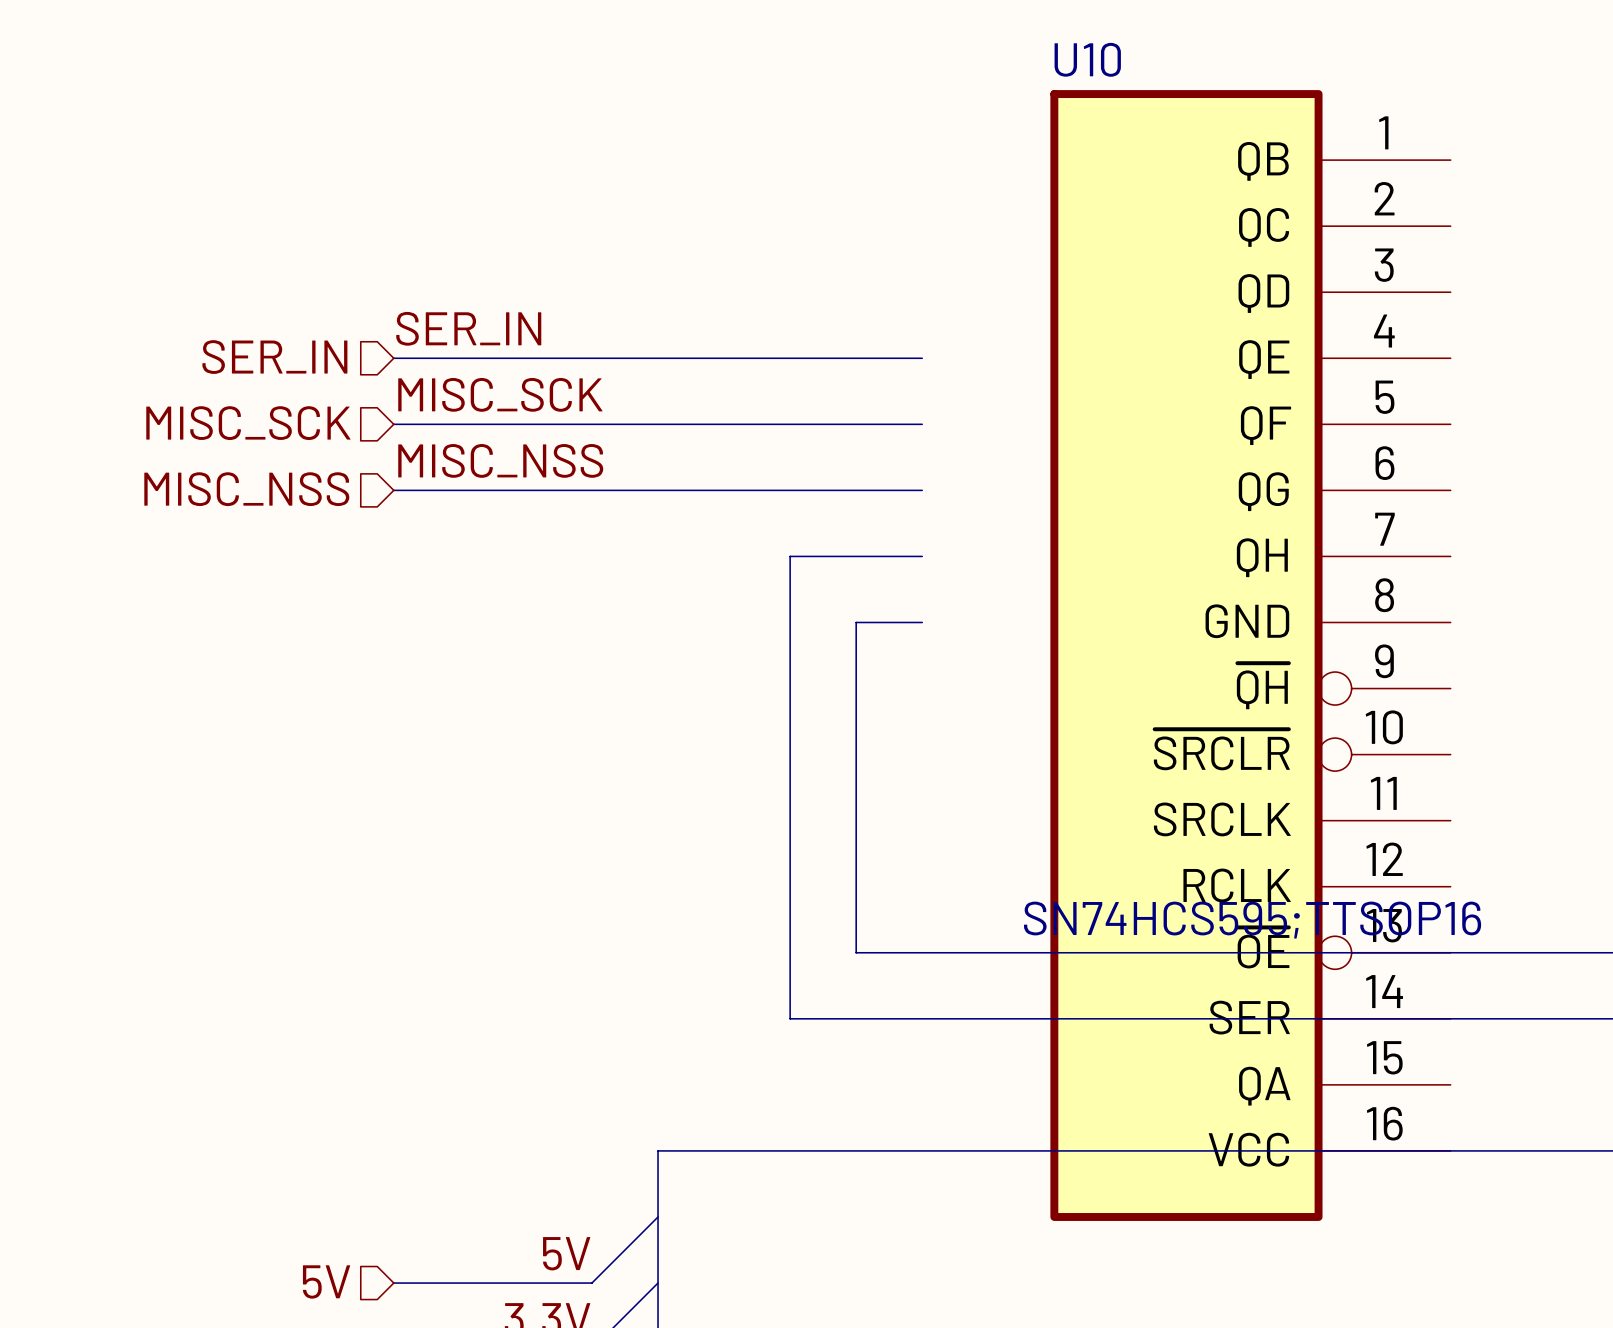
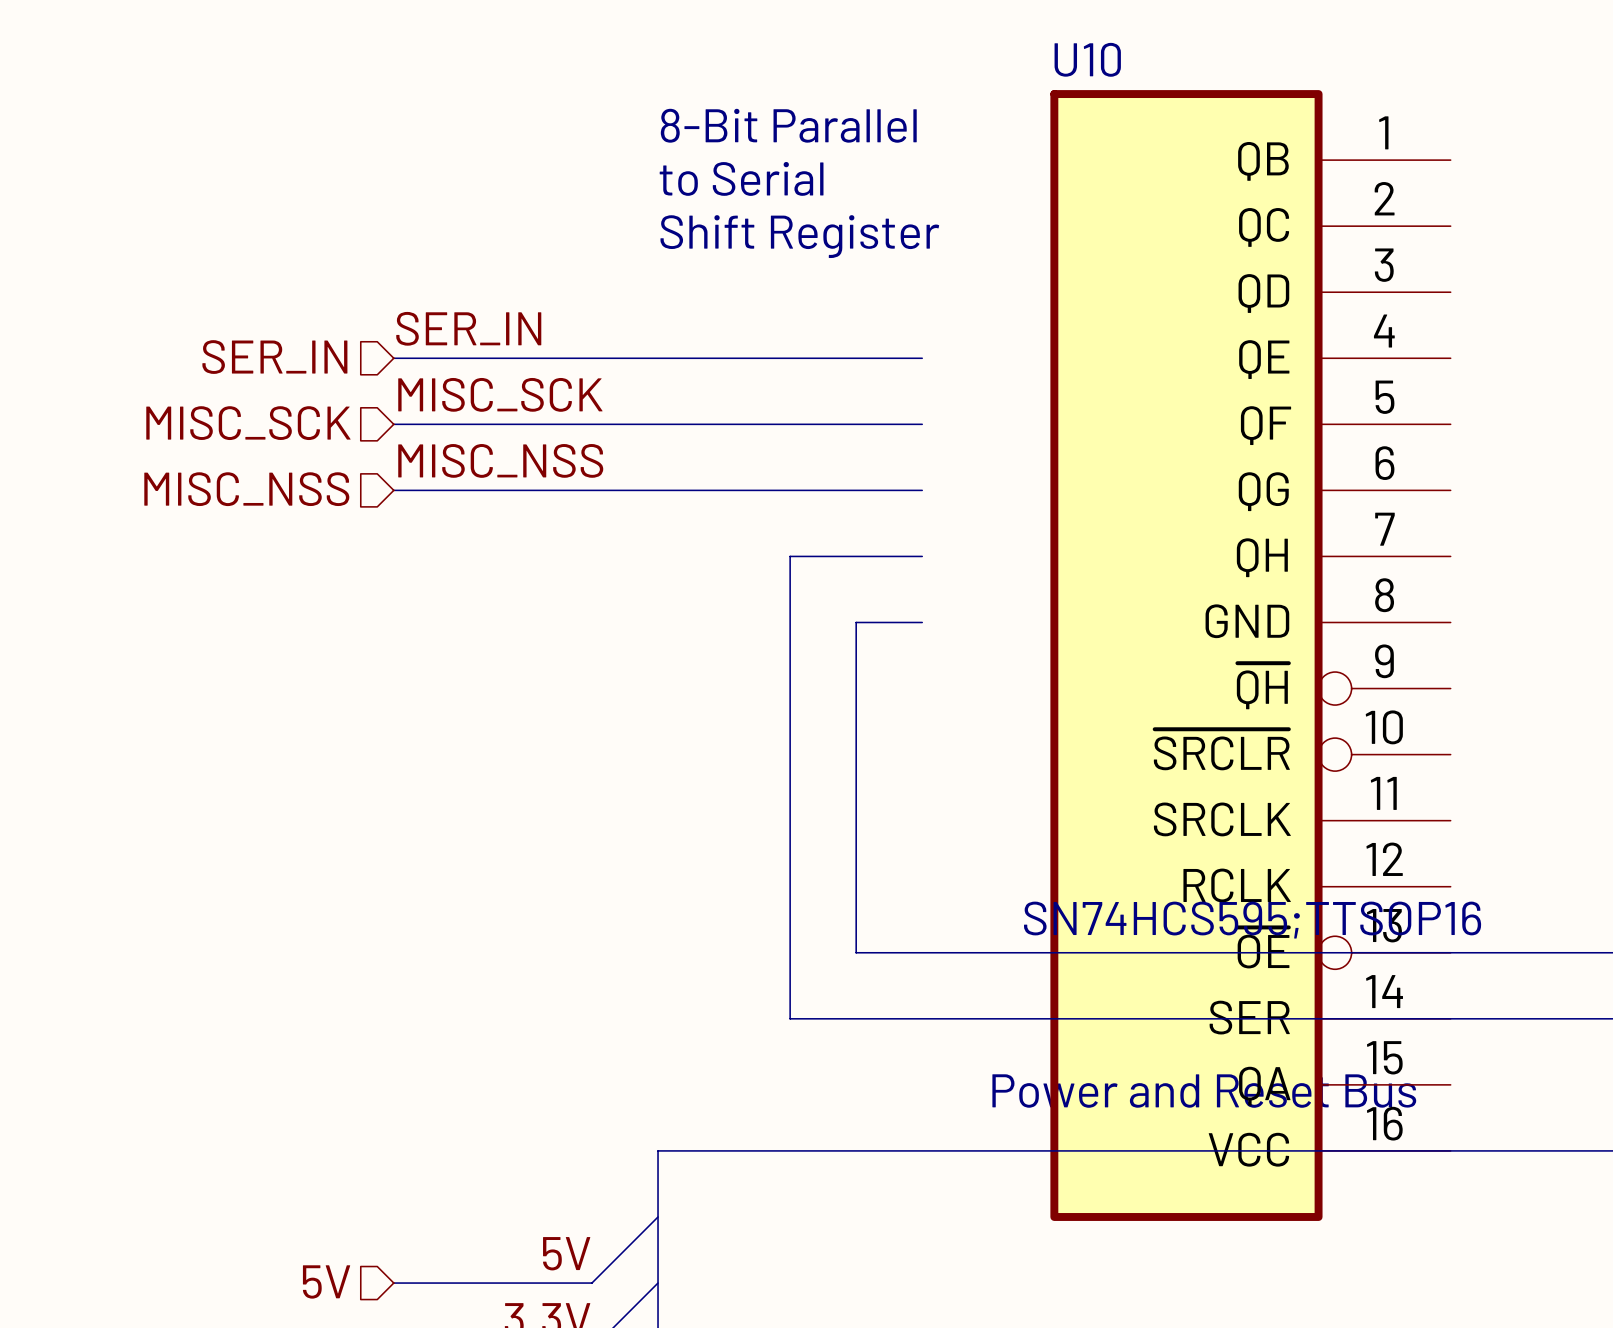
text: none -> 8-Bit Parallel (788, 125)
text: none -> to Serial (741, 178)
text: none -> Shift Register (799, 236)
text: none -> Power and Reset Bus (1204, 1091)

